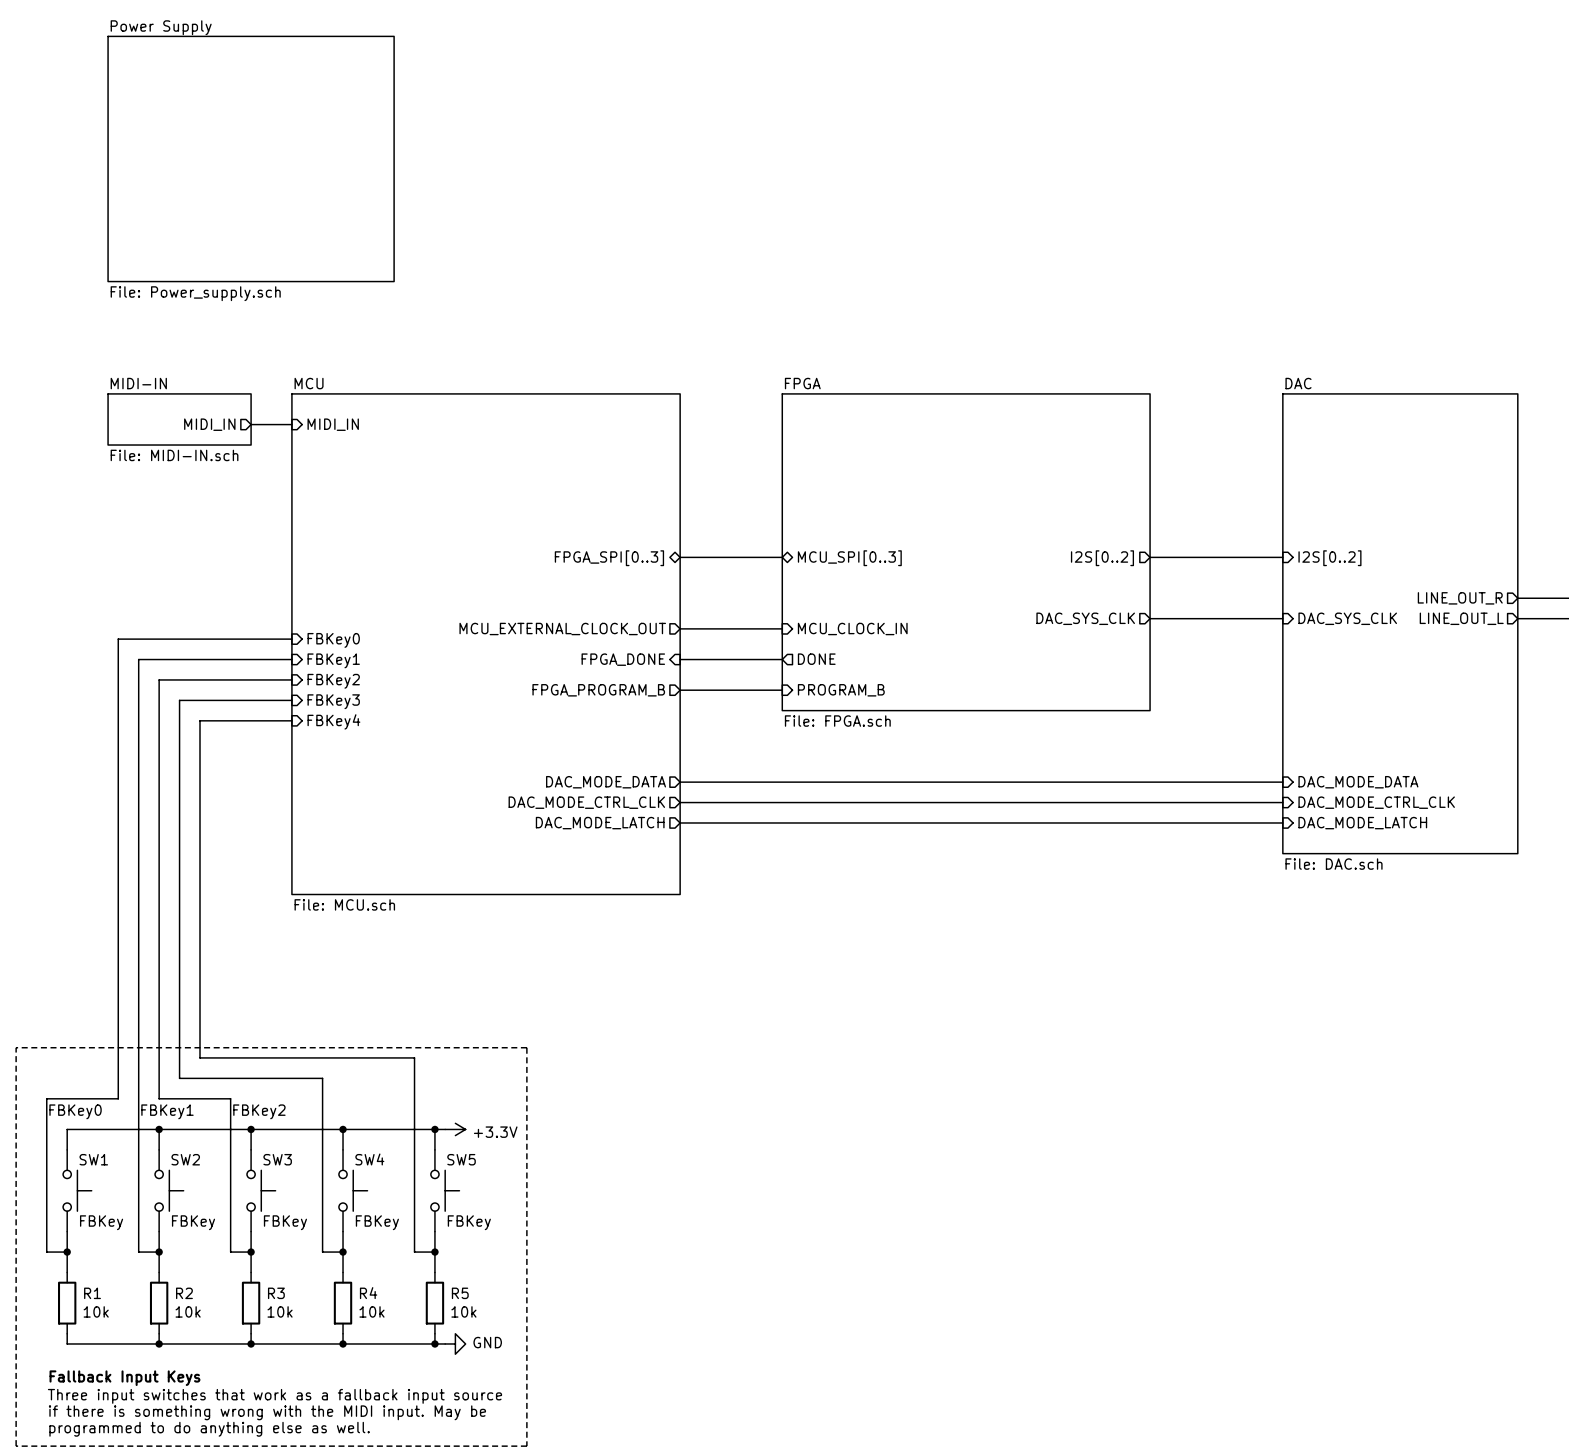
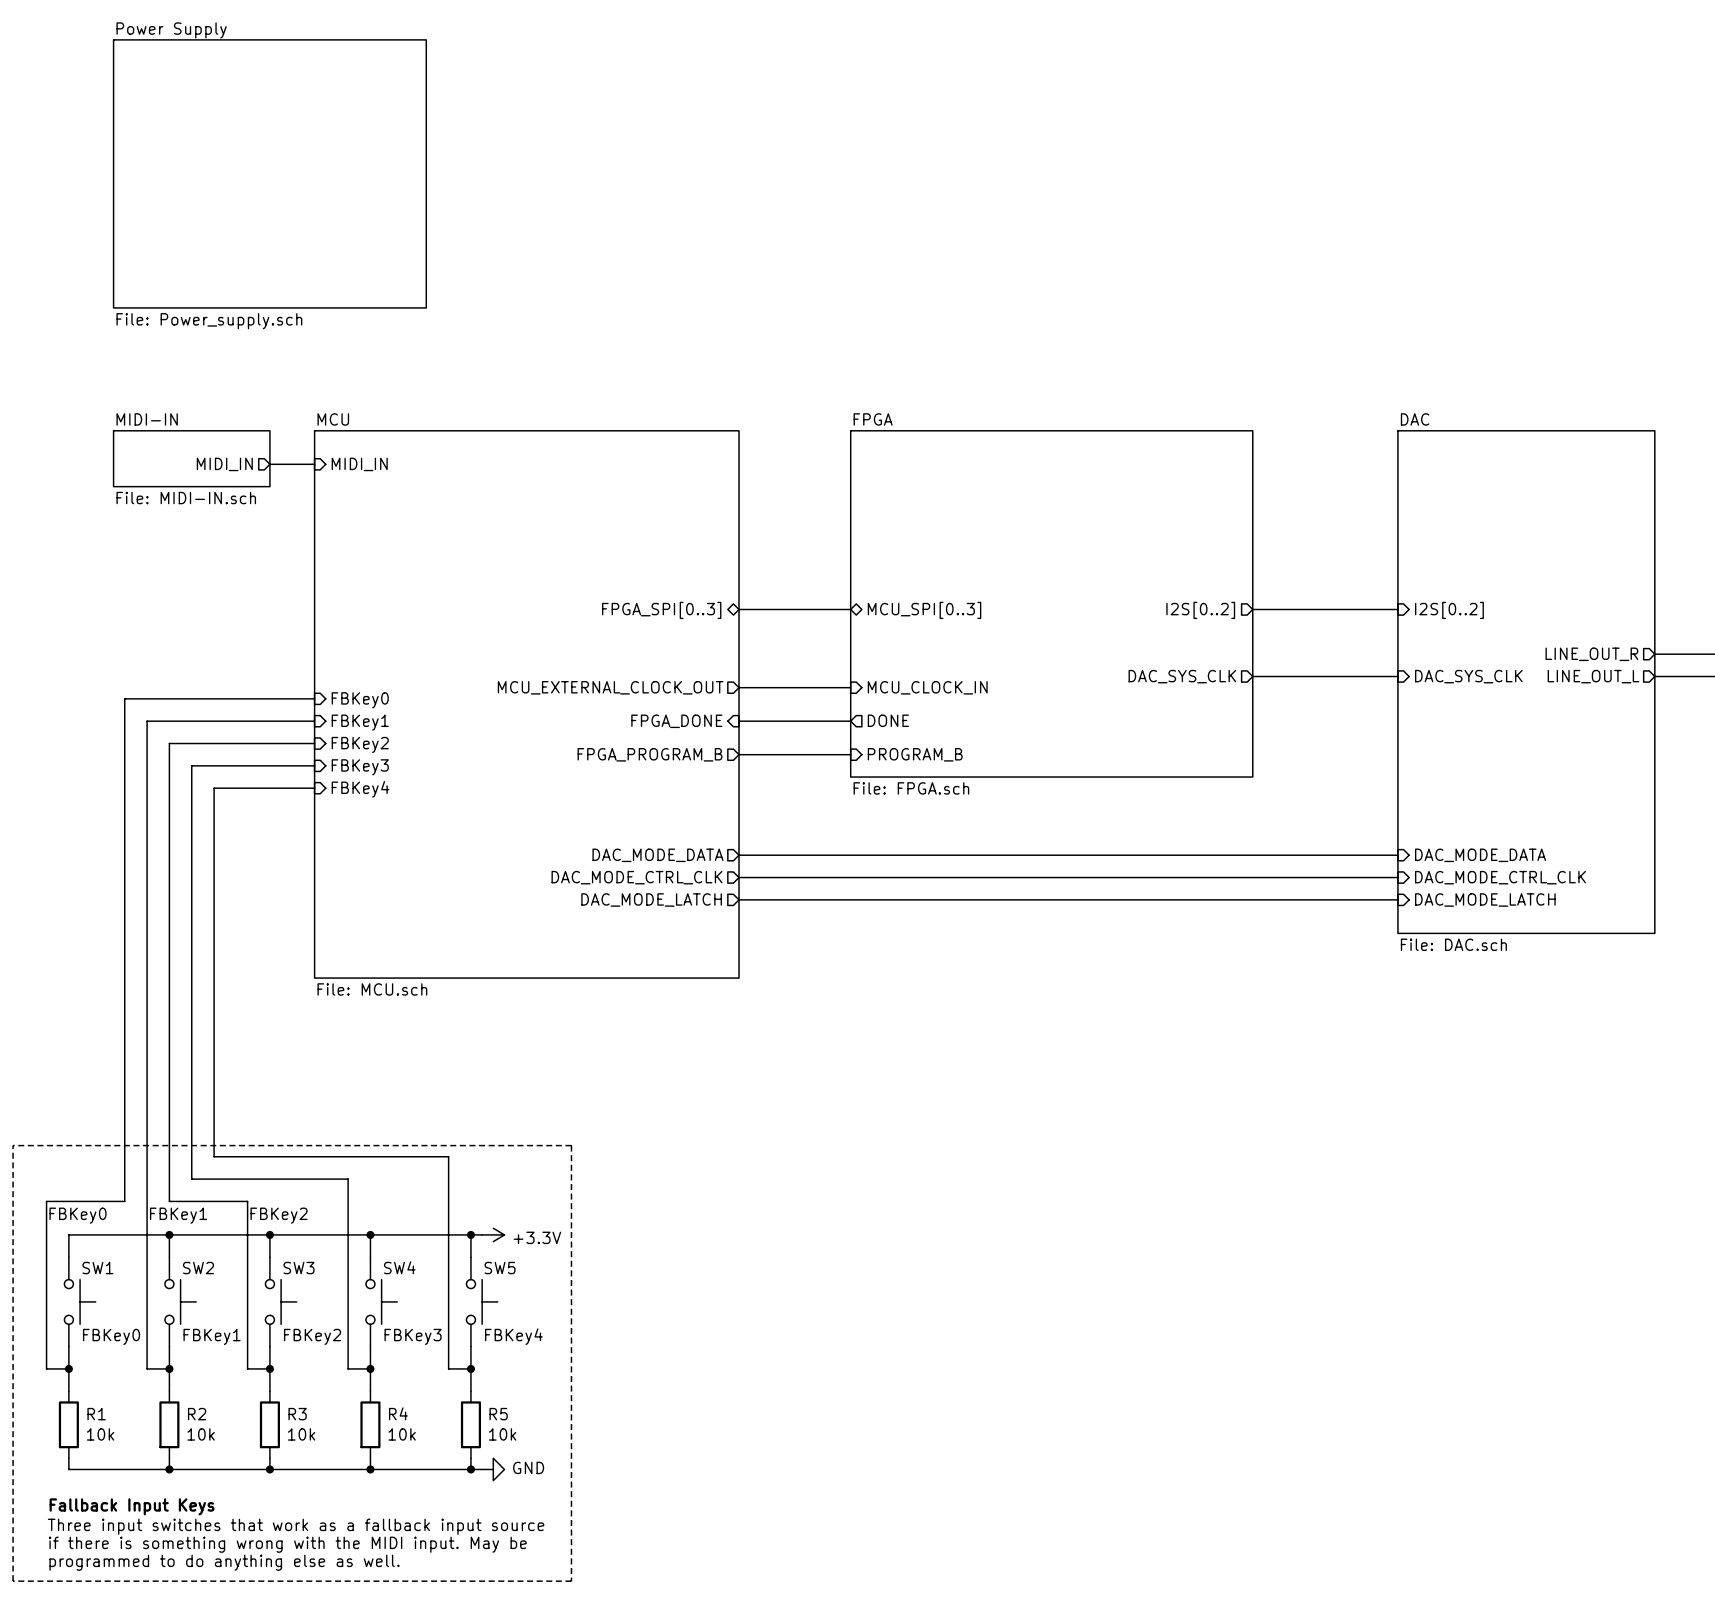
SW1 value: FBKey (101, 1222) -> FBKey0 (111, 1336)
SW2 value: FBKey (193, 1222) -> FBKey1 (212, 1336)
SW3 value: FBKey (285, 1222) -> FBKey2 (312, 1336)
SW4 value: FBKey (377, 1222) -> FBKey3 (413, 1336)
SW5 value: FBKey (469, 1222) -> FBKey4 (513, 1336)

